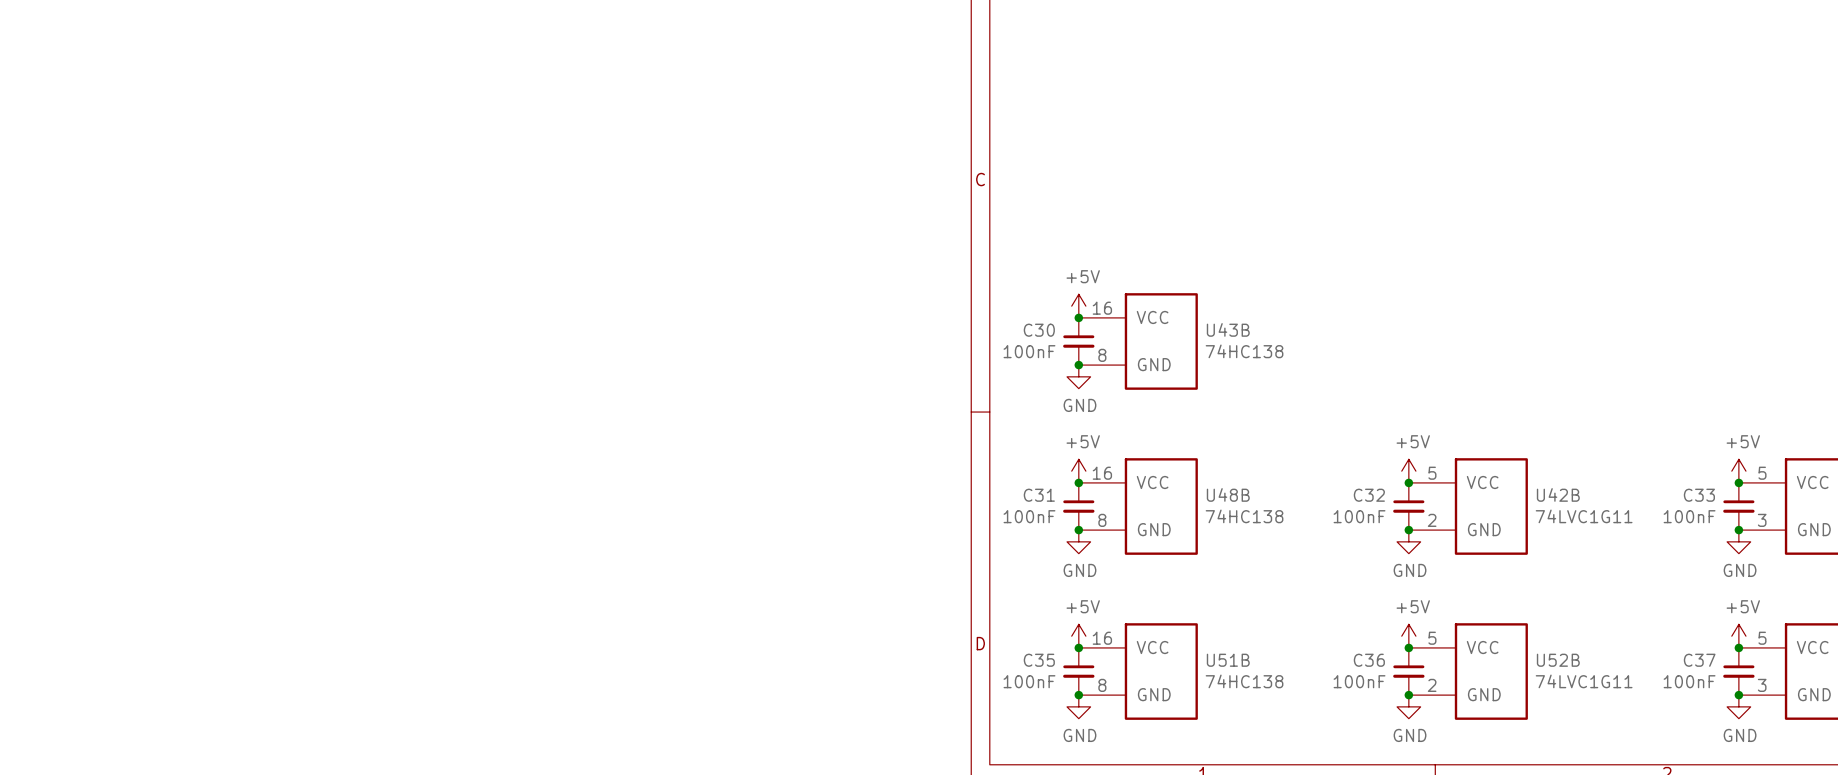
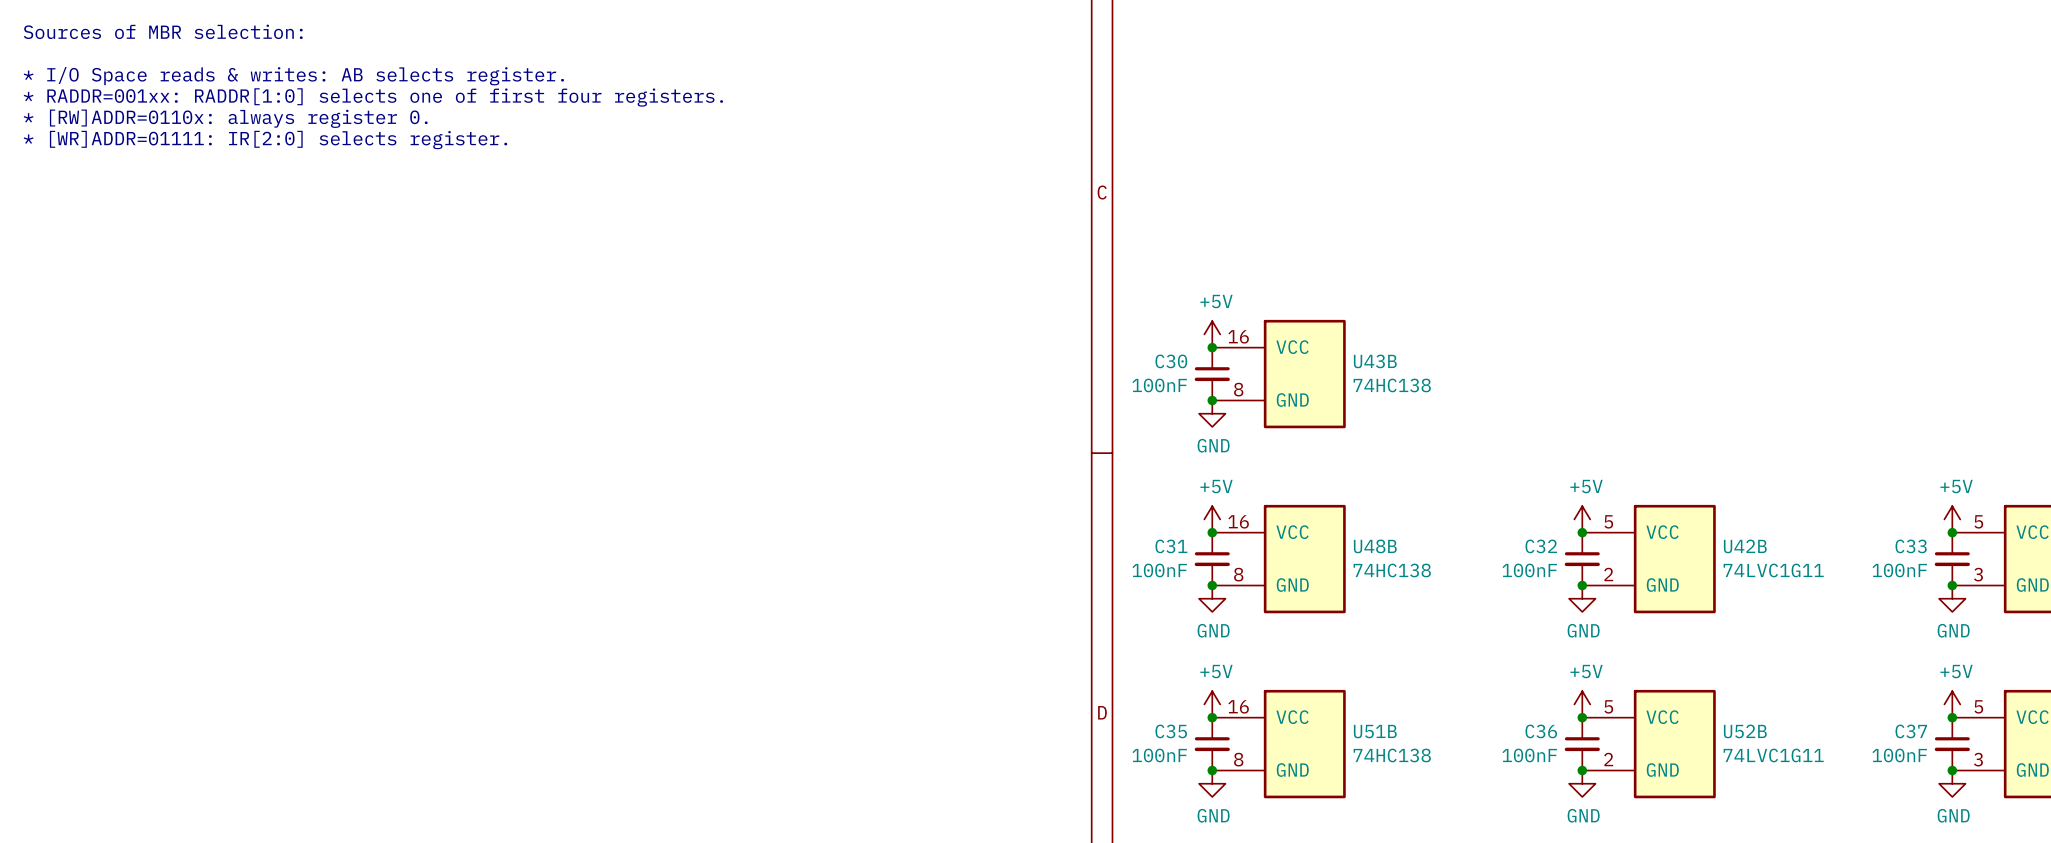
text: none -> Sources of MBR selection: (163, 31)
text: none -> * I/O Space reads & writes: AB selects register. (293, 76)
text: none -> * RADDR=001xx: RADDR[1:0] selects one of first four registers. (373, 97)
text: none -> * [RW]ADDR=0110x: always register 0. (225, 118)
text: none -> * [WR]ADDR=01111: IR[2:0] selects register. (265, 140)

